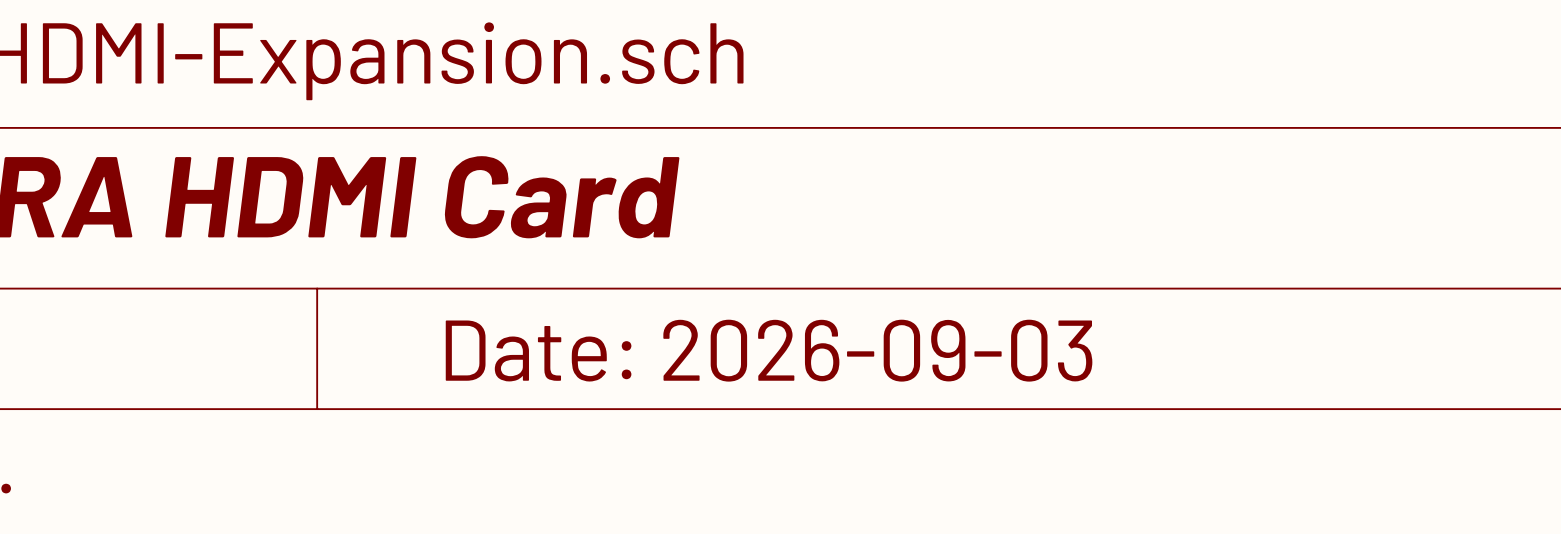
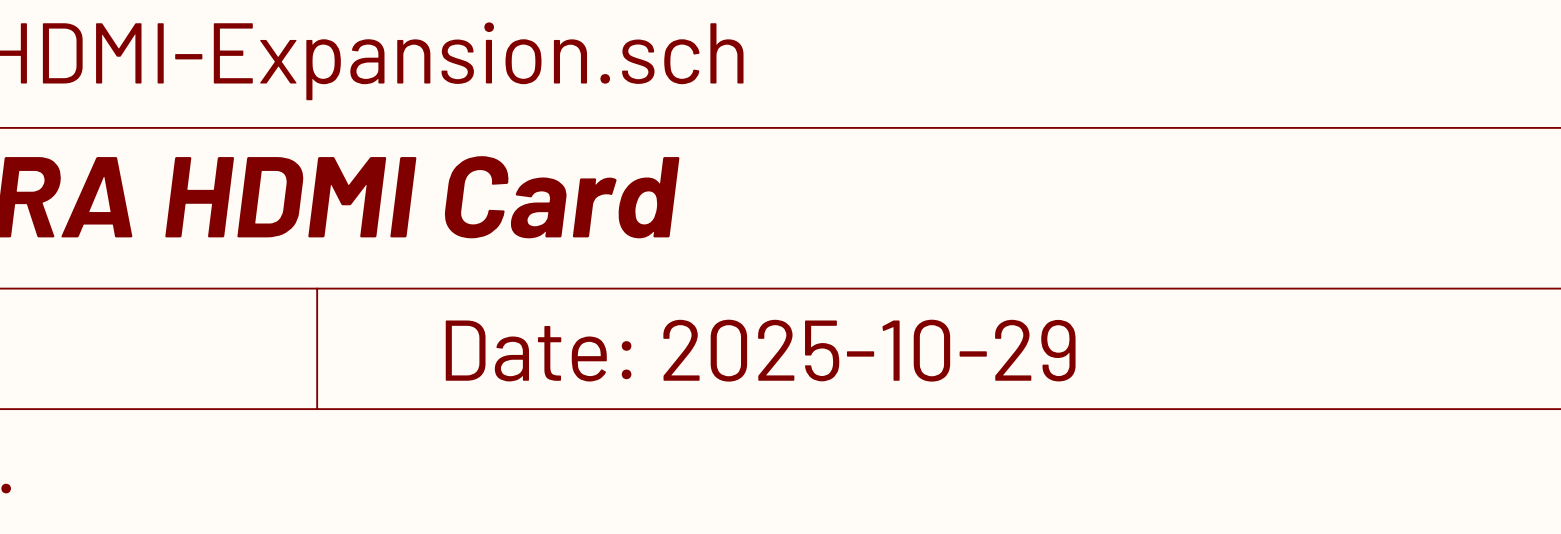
title block: Date: 2026-09-03 (769, 350) -> Date: 2025-10-29 (760, 350)

